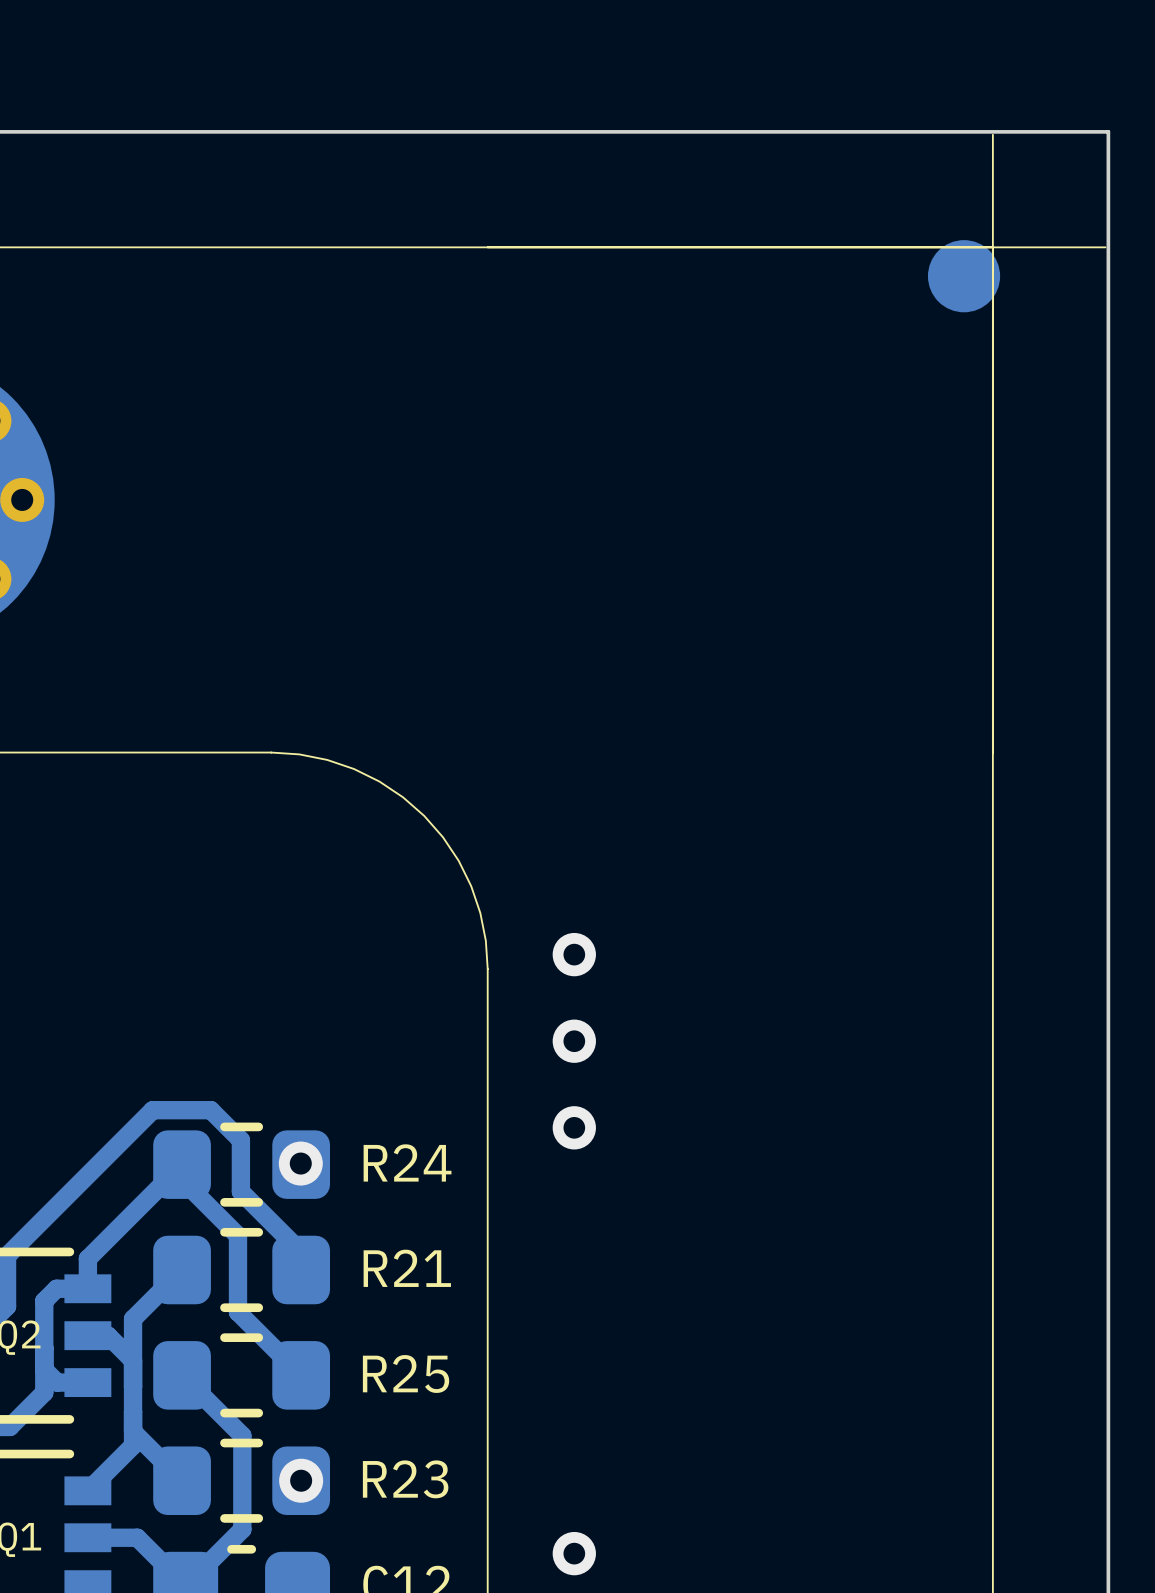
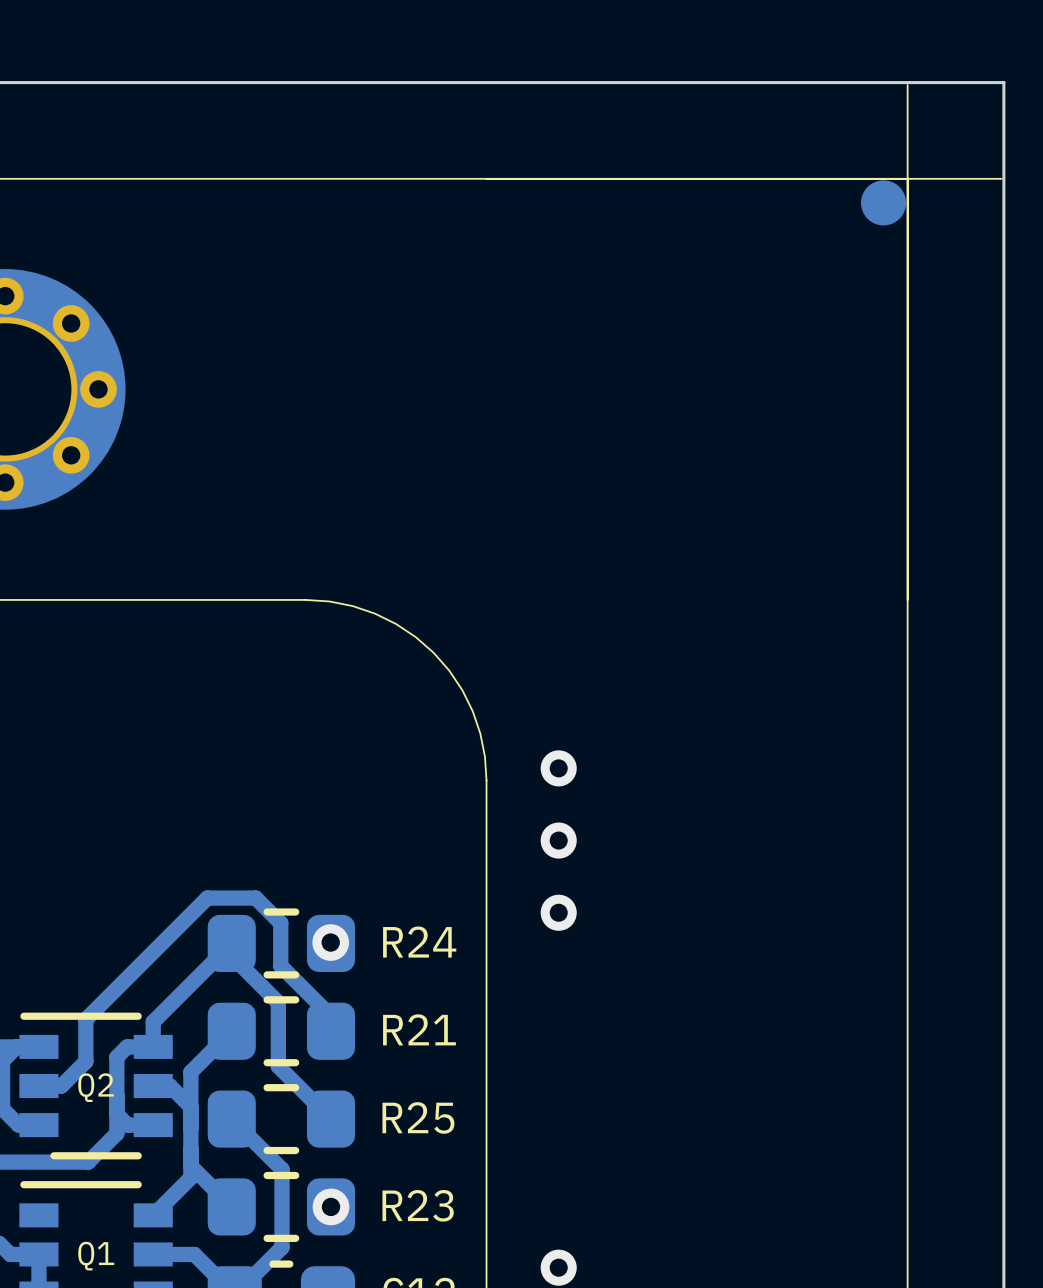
part footprint: [927, 240, 1001, 313] -> [861, 180, 907, 226]

